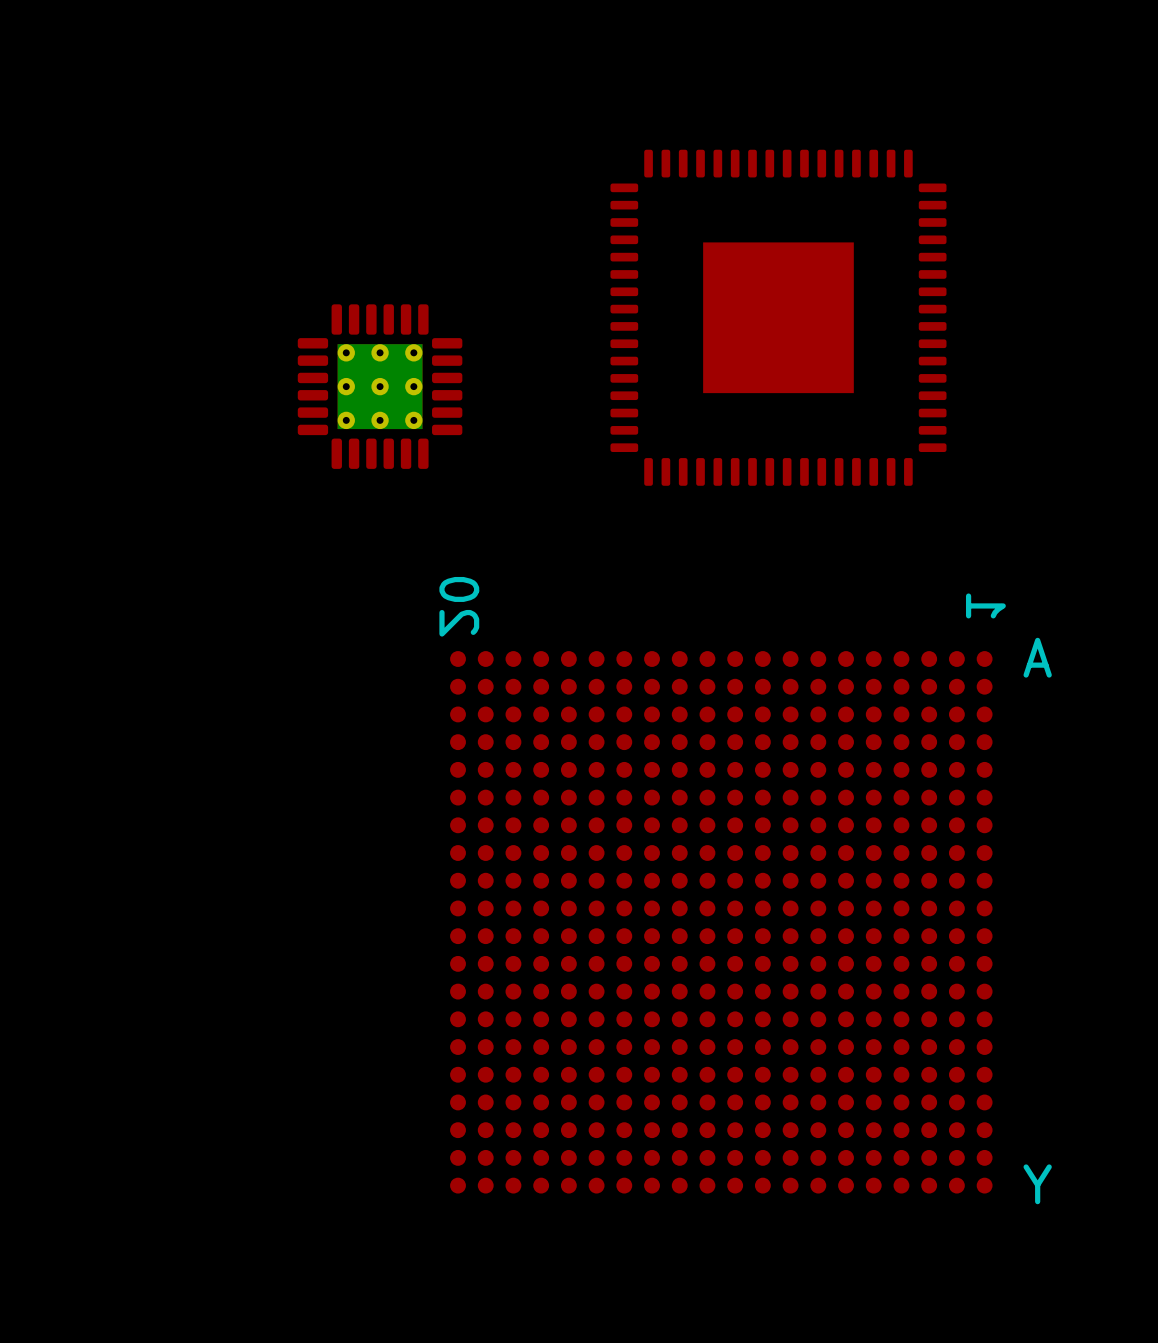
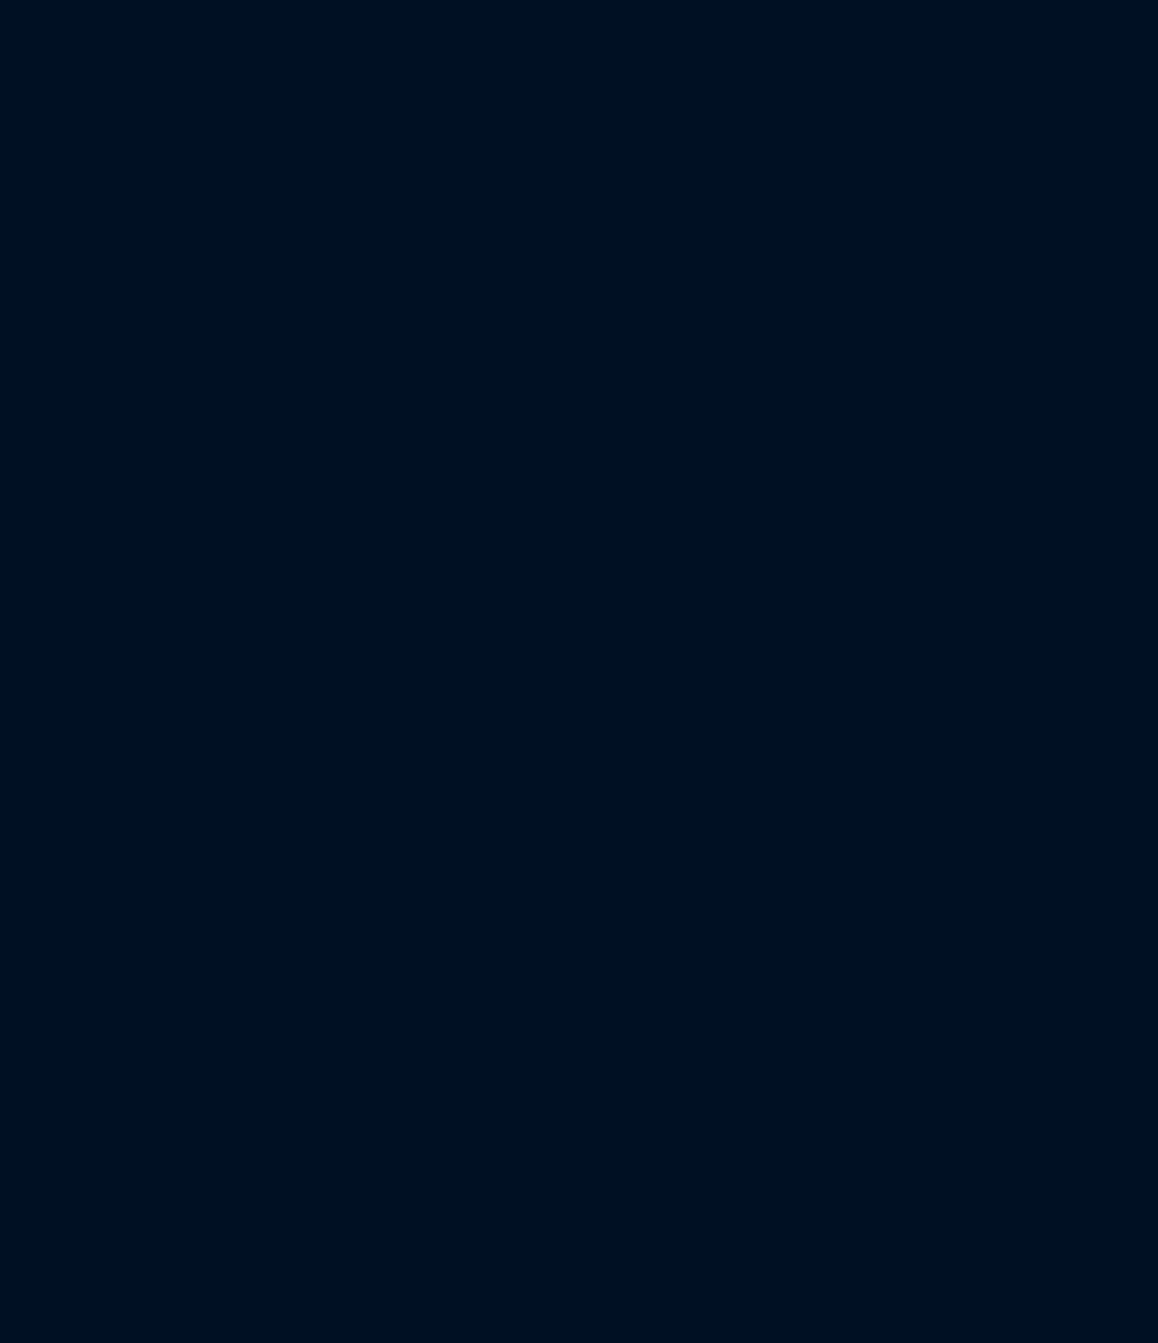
part: (778, 317) -> none
part: (380, 386) -> none
part: (721, 922) -> none

